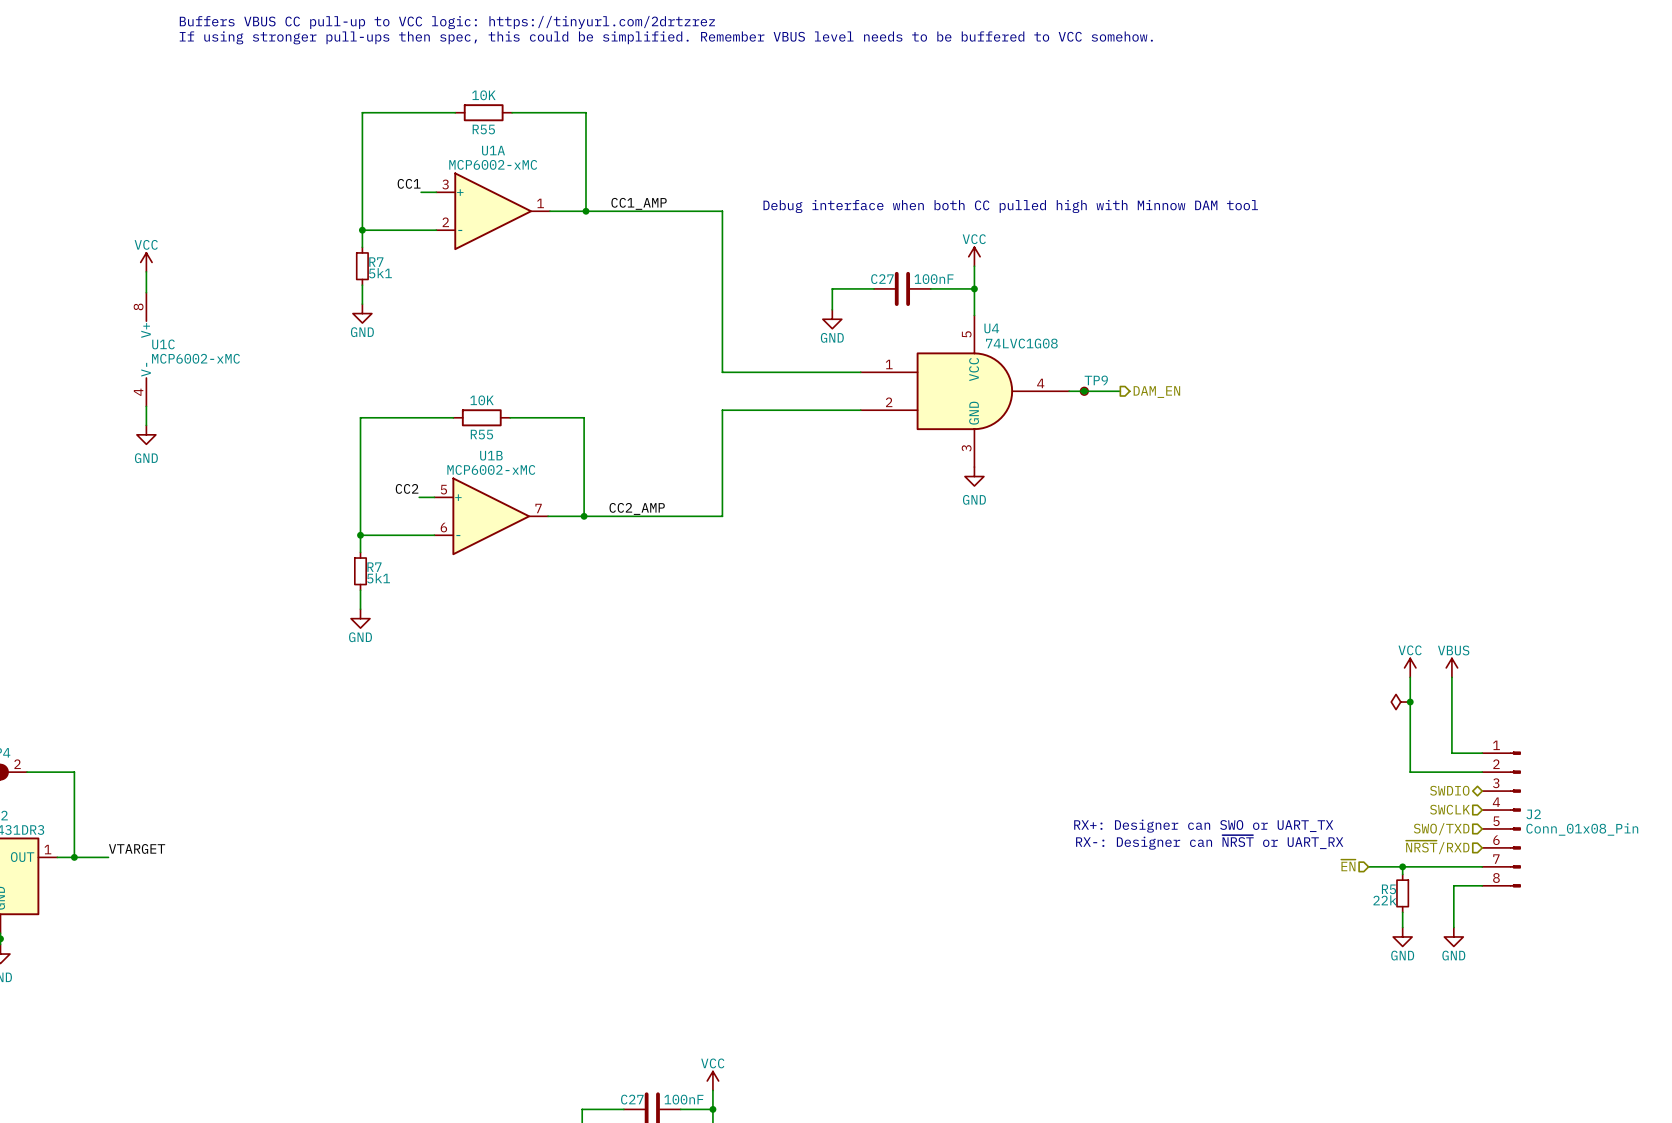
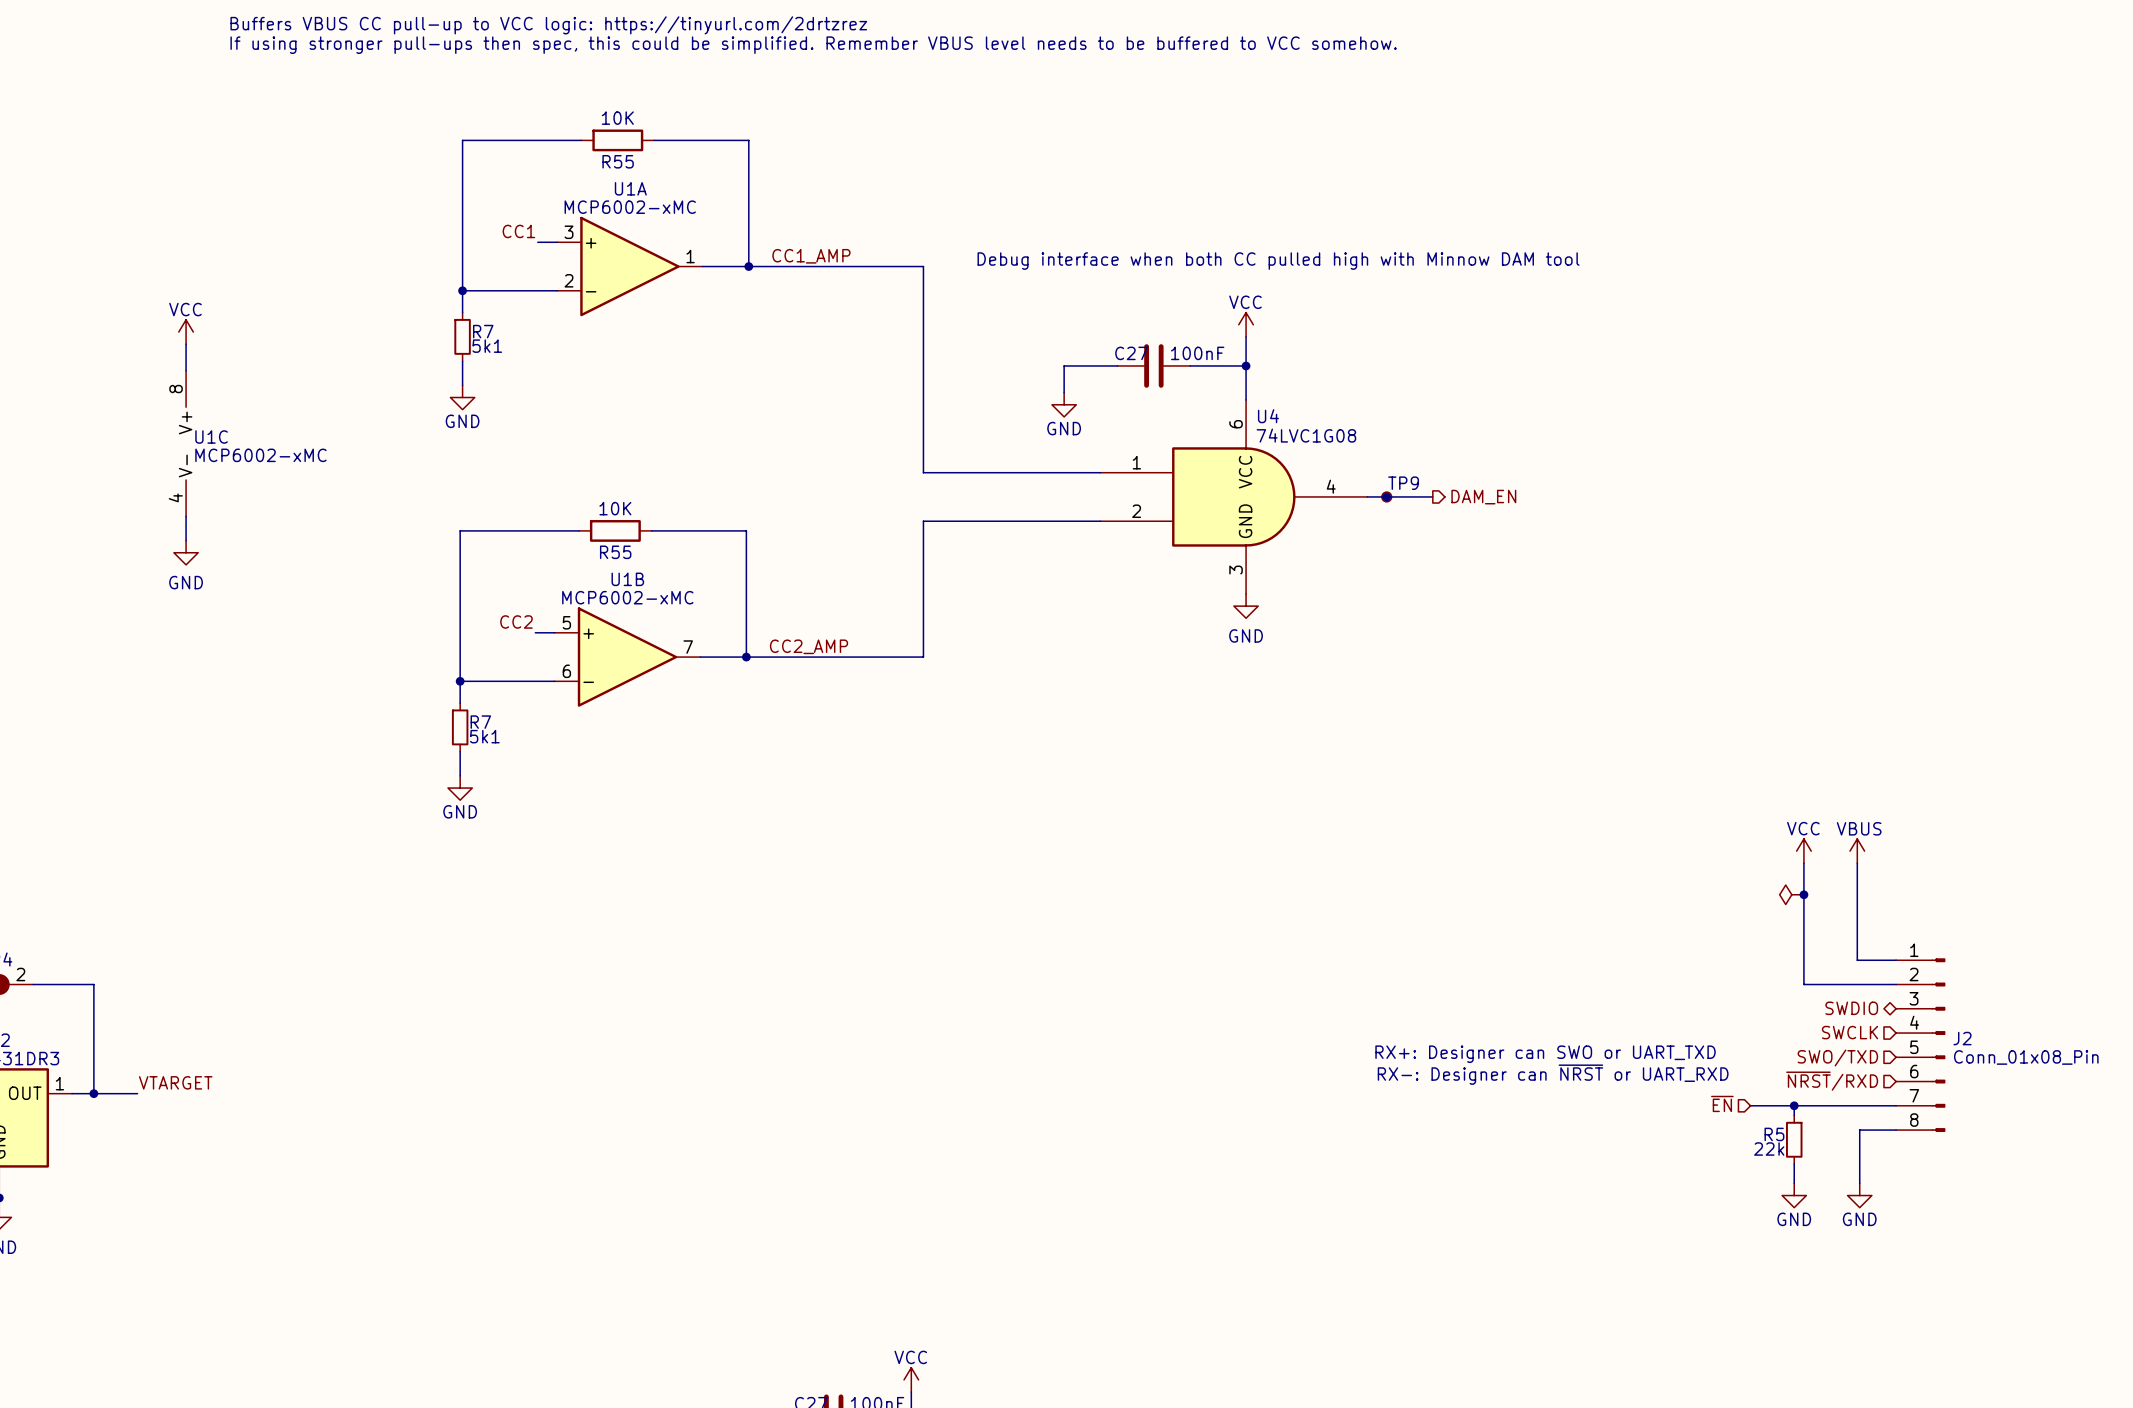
U4 pin number: 5 (966, 334) -> 6 (1236, 424)
text: RX+: Designer can SWO or UART_TX (1203, 826) -> RX+: Designer can SWO or UART_TXD (1545, 1054)
text: RX-: Designer can ~{NRST} or UART_RX (1209, 842) -> RX-: Designer can ~{NRST} or UART_RXD (1553, 1074)

